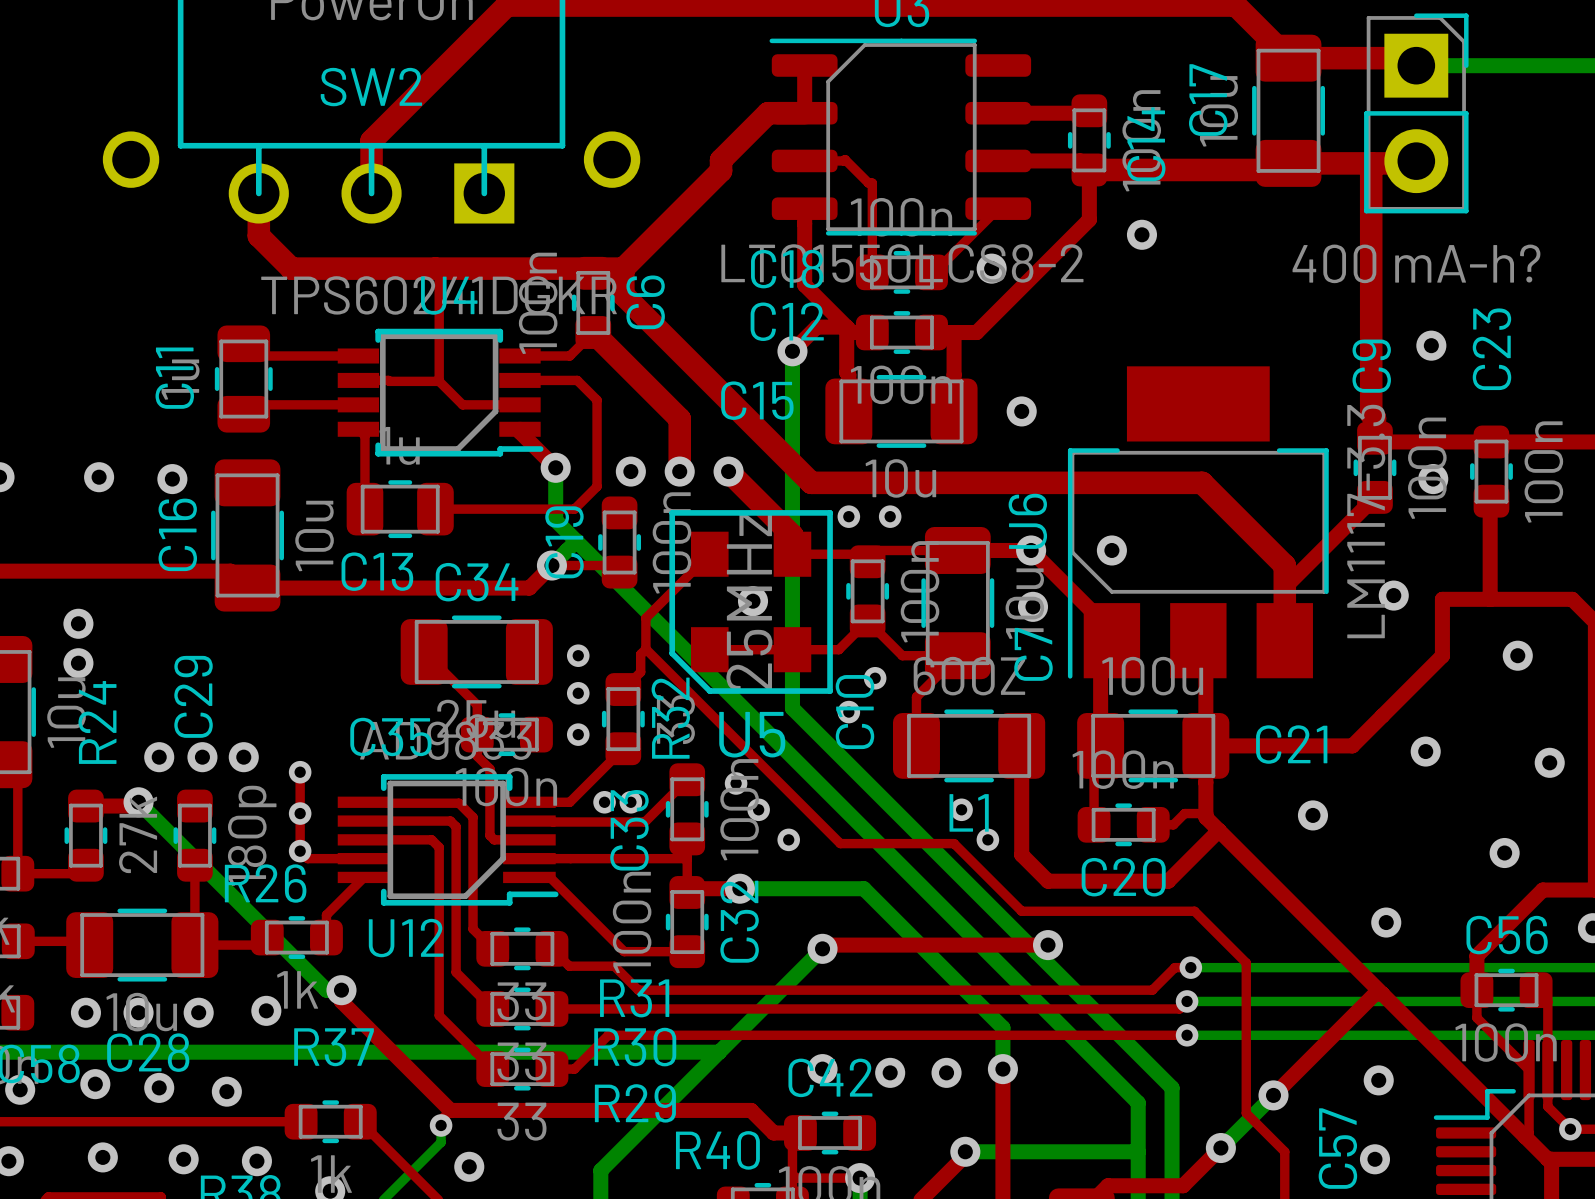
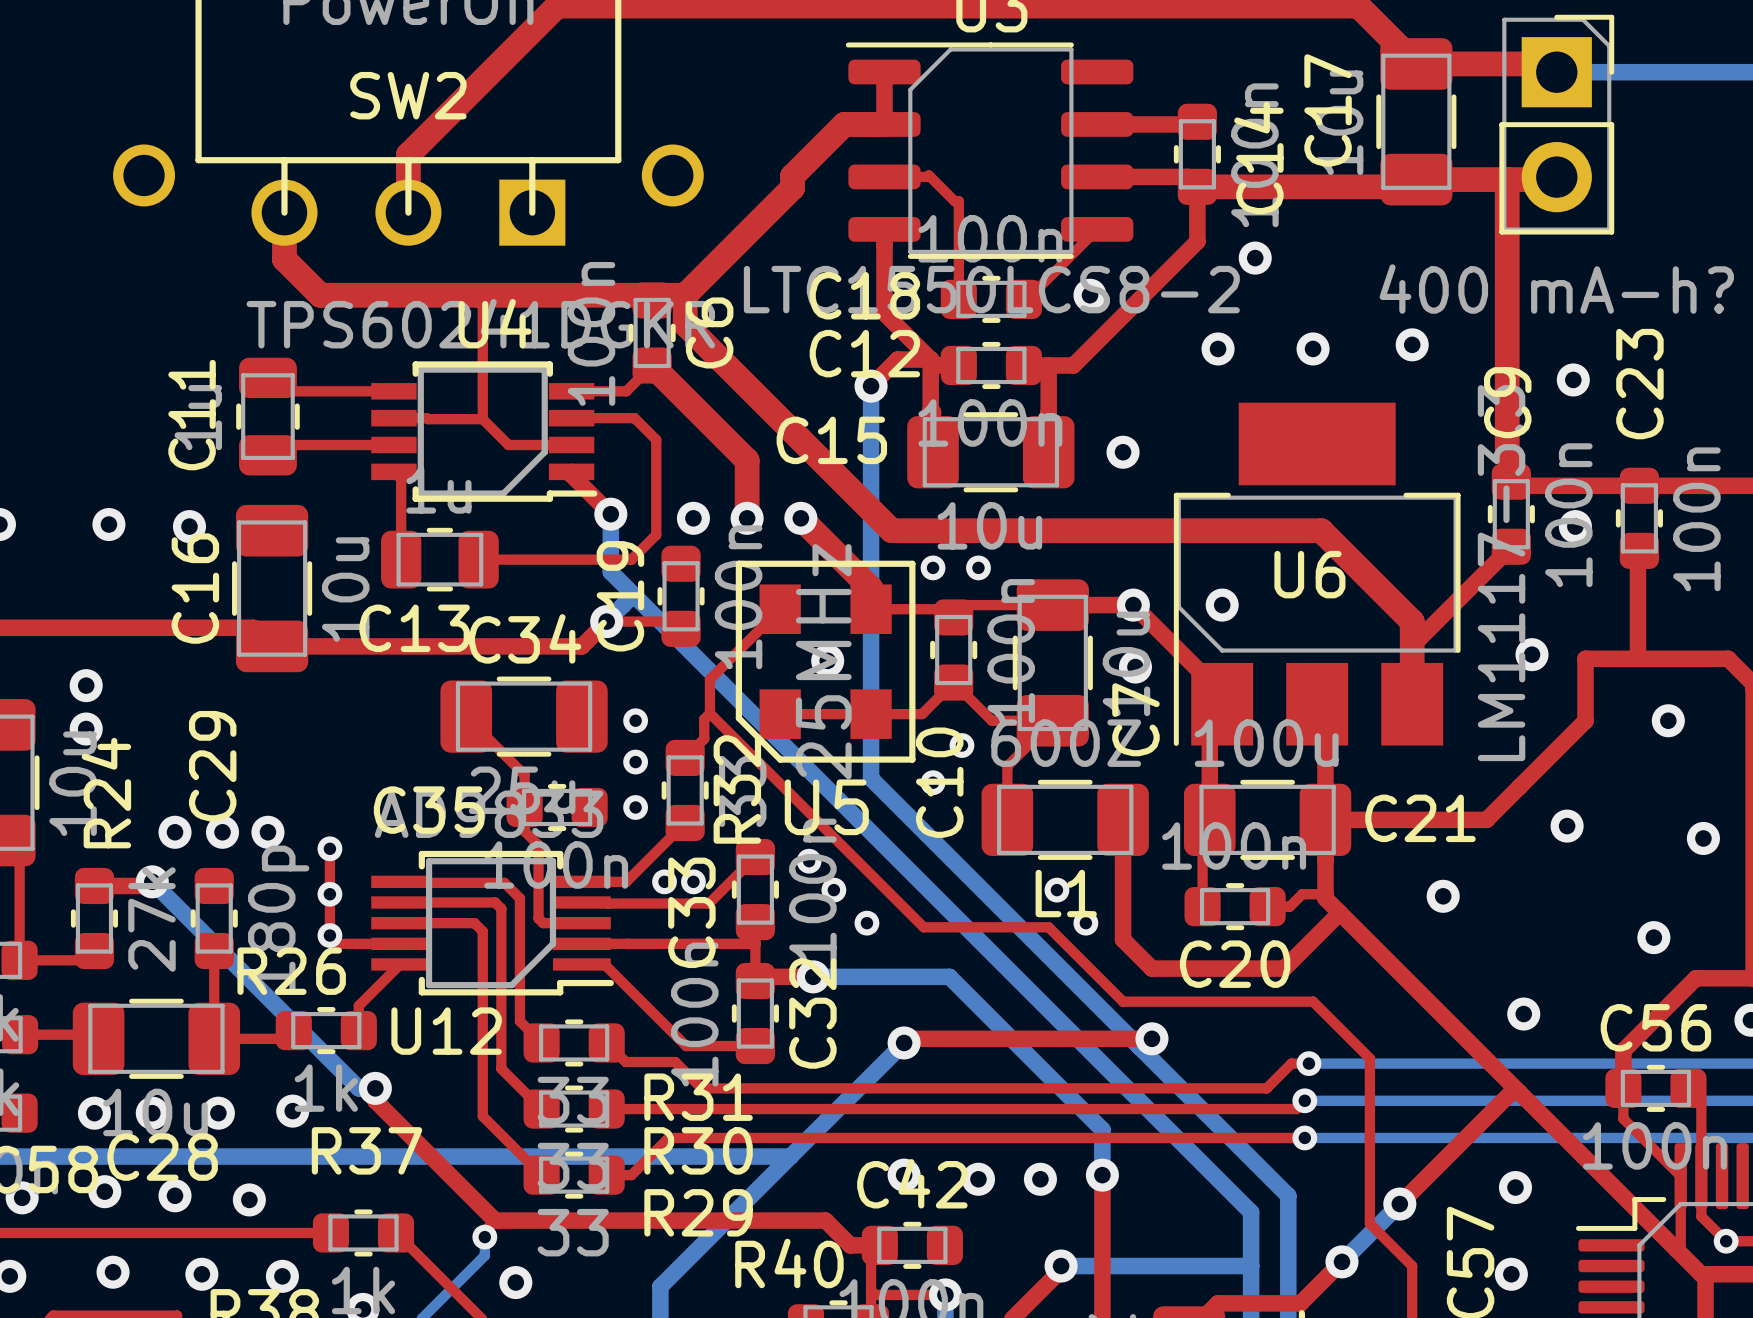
via: none -> (1412, 344)
via: none -> (1218, 348)
via: none -> (1313, 348)
U6 name rotation: 0° (1027, 521) -> 90° clockwise (1309, 574)
U6 name position: U6 (1027, 521) -> U6 (1309, 574)

